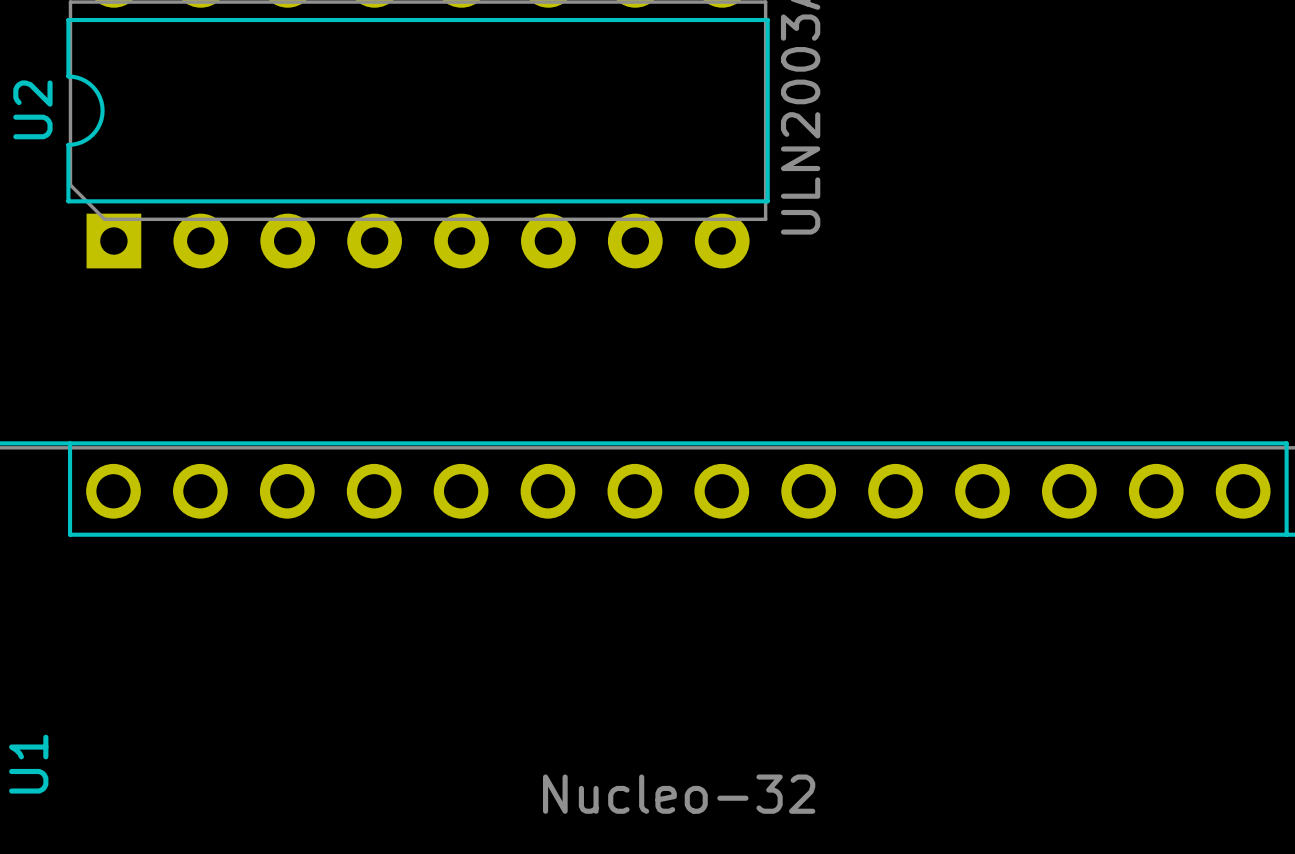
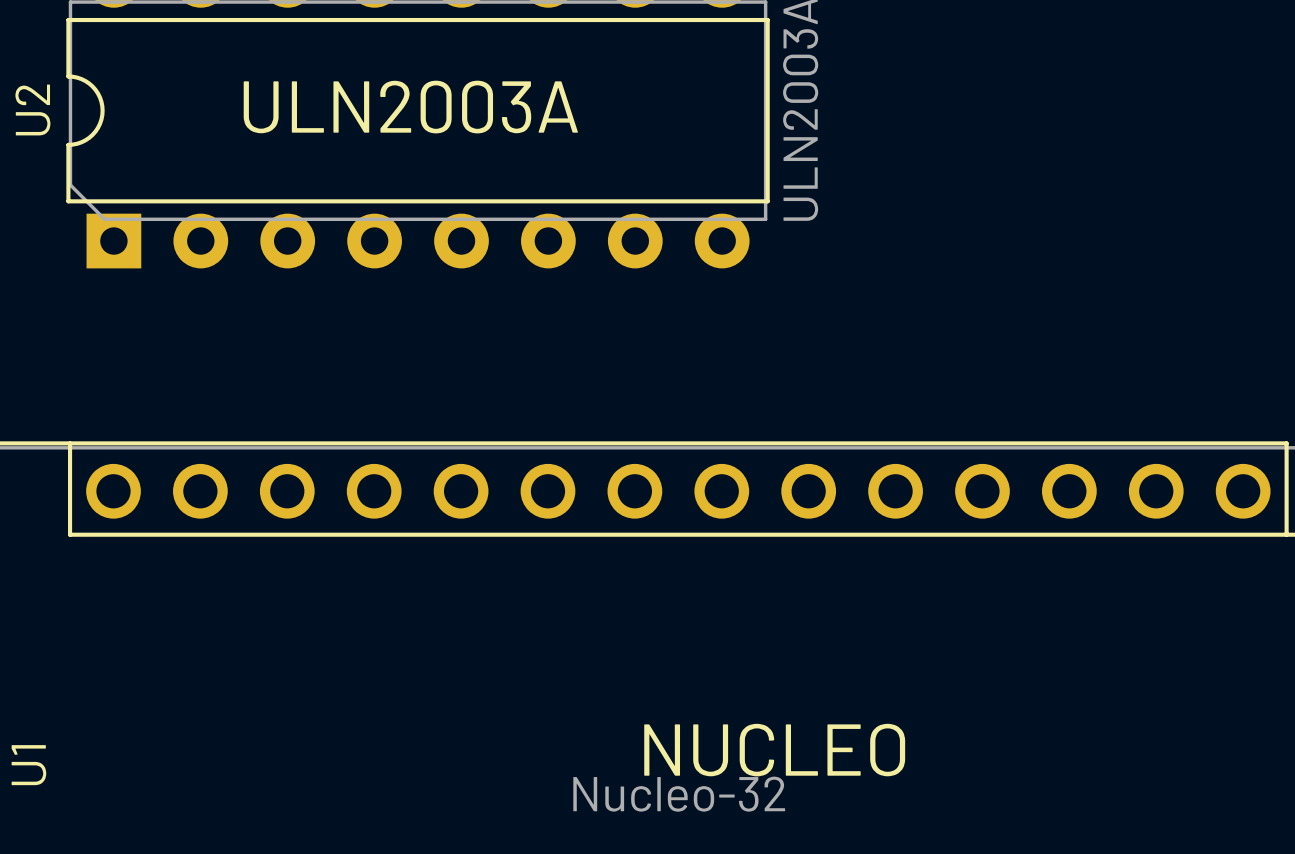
text: none -> ULN2003A (410, 107)
text: none -> NUCLEO (774, 750)

